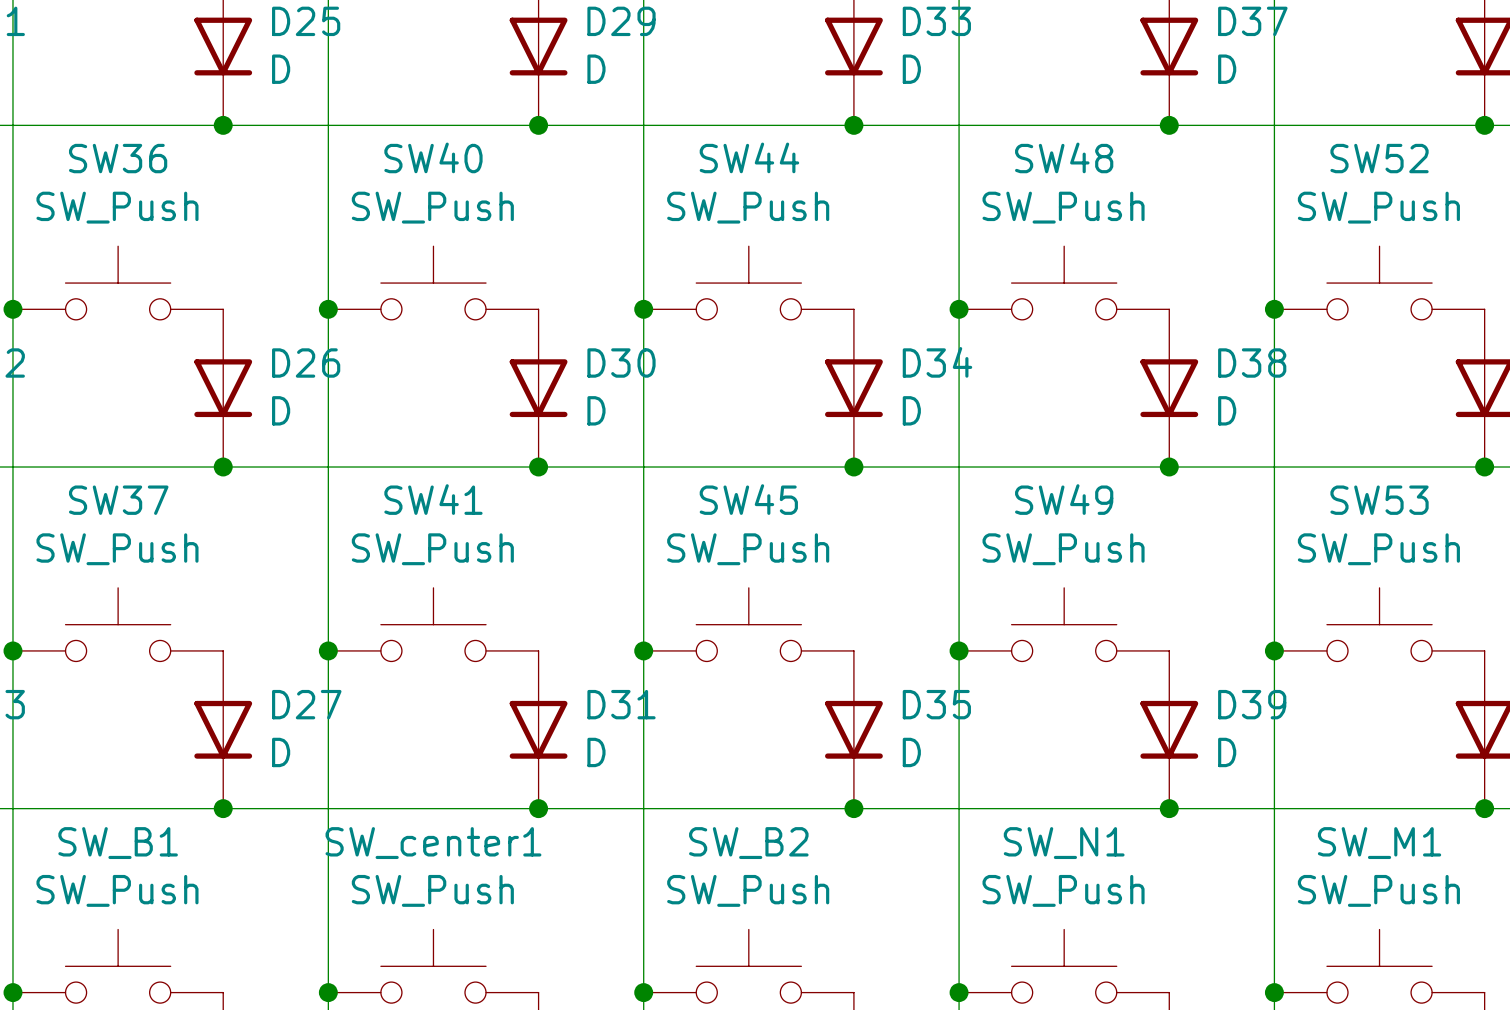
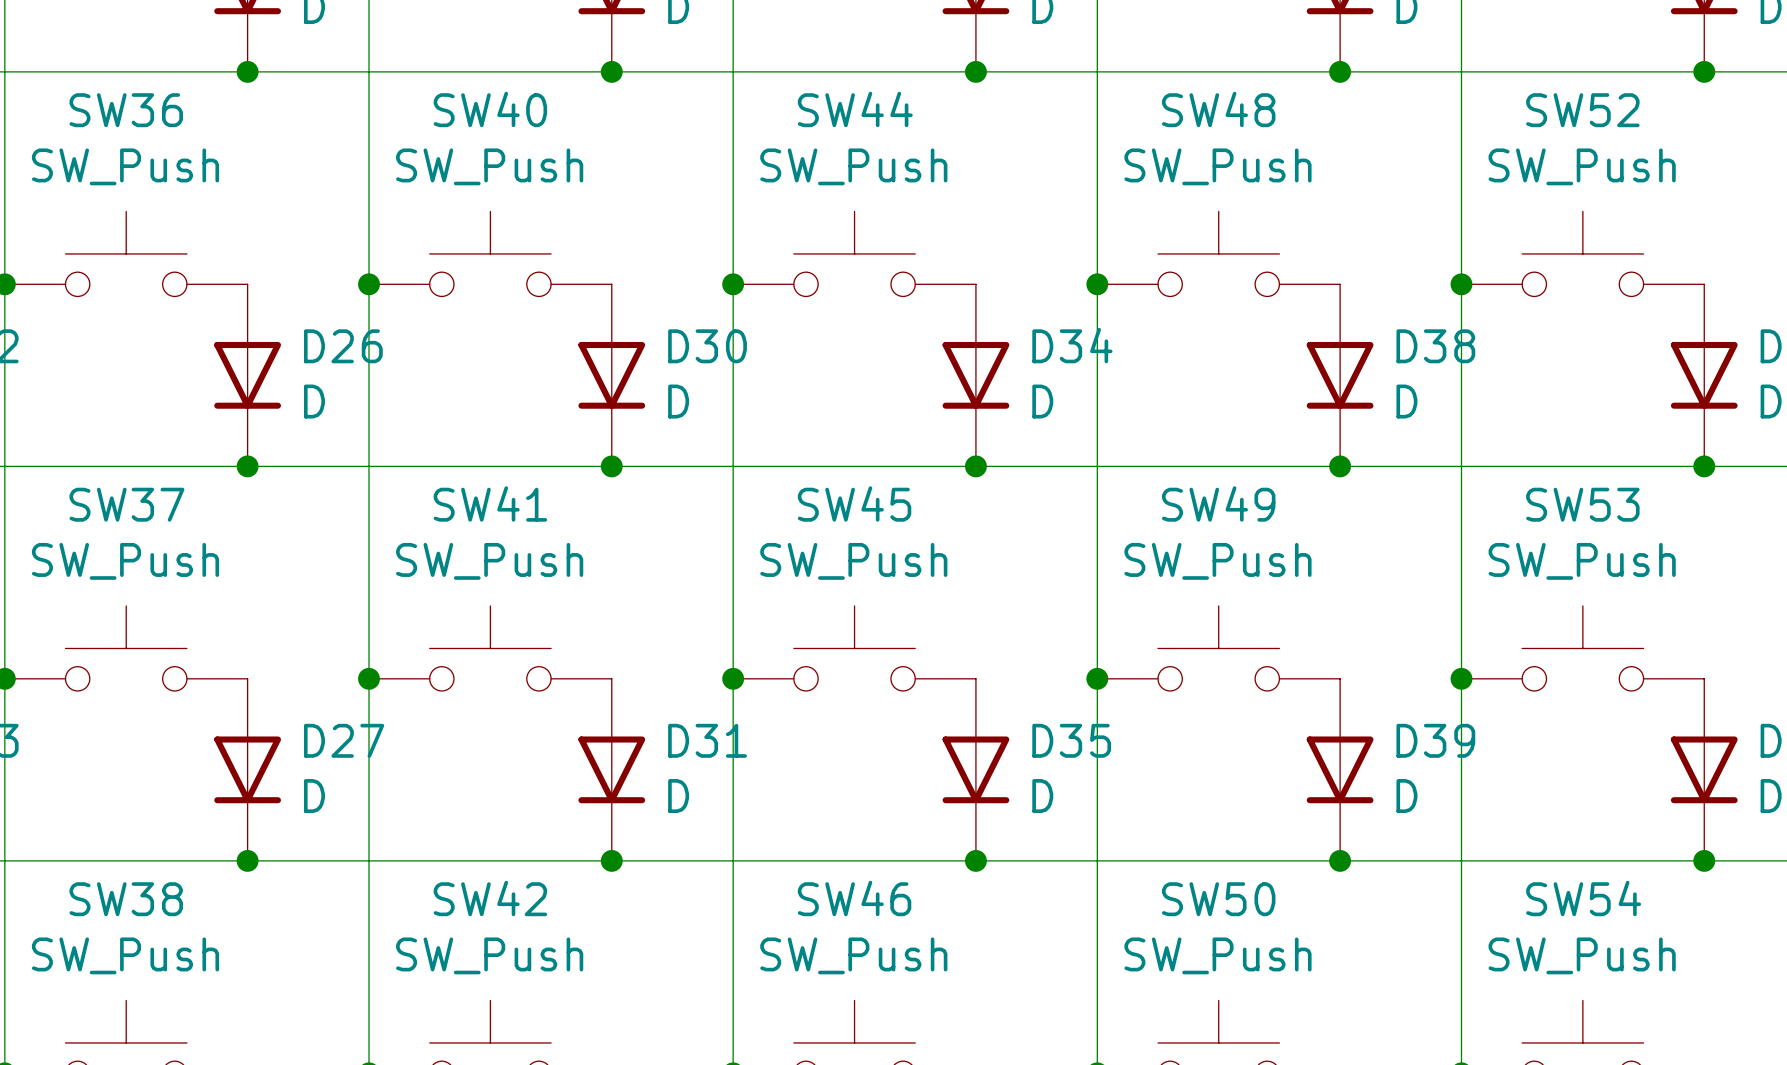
SW_B1 name: SW_B1 (118, 843) -> SW38 (126, 899)
SW_center1 name: SW_center1 (433, 843) -> SW42 (490, 898)
SW_B2 name: SW_B2 (748, 843) -> SW46 (854, 898)
SW_N1 name: SW_N1 (1064, 843) -> SW50 (1218, 899)
SW_M1 name: SW_M1 (1379, 843) -> SW54 (1583, 898)

